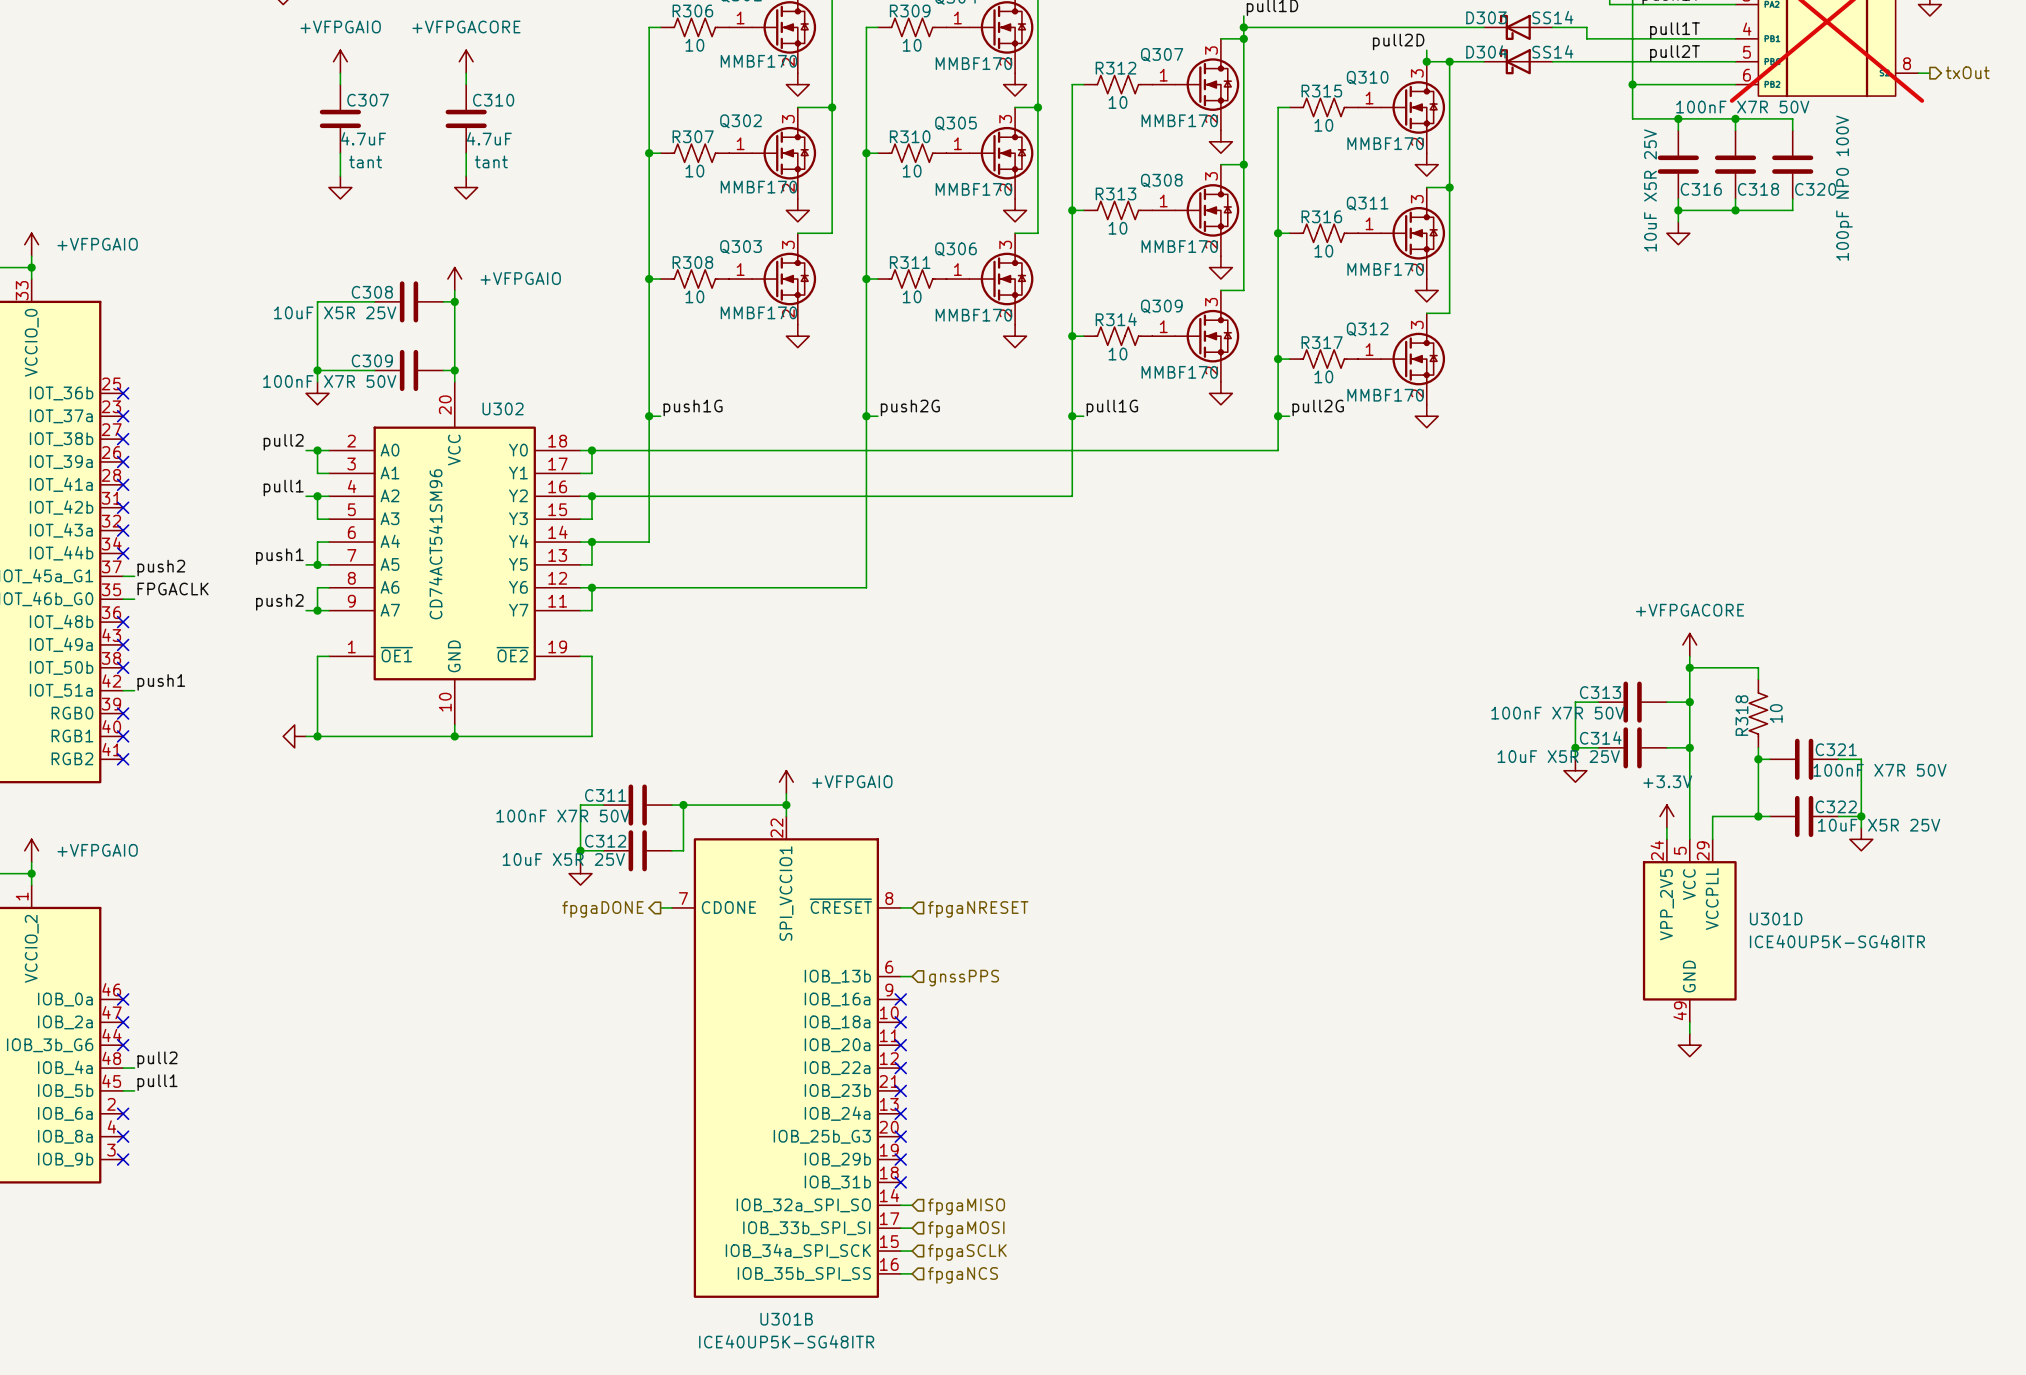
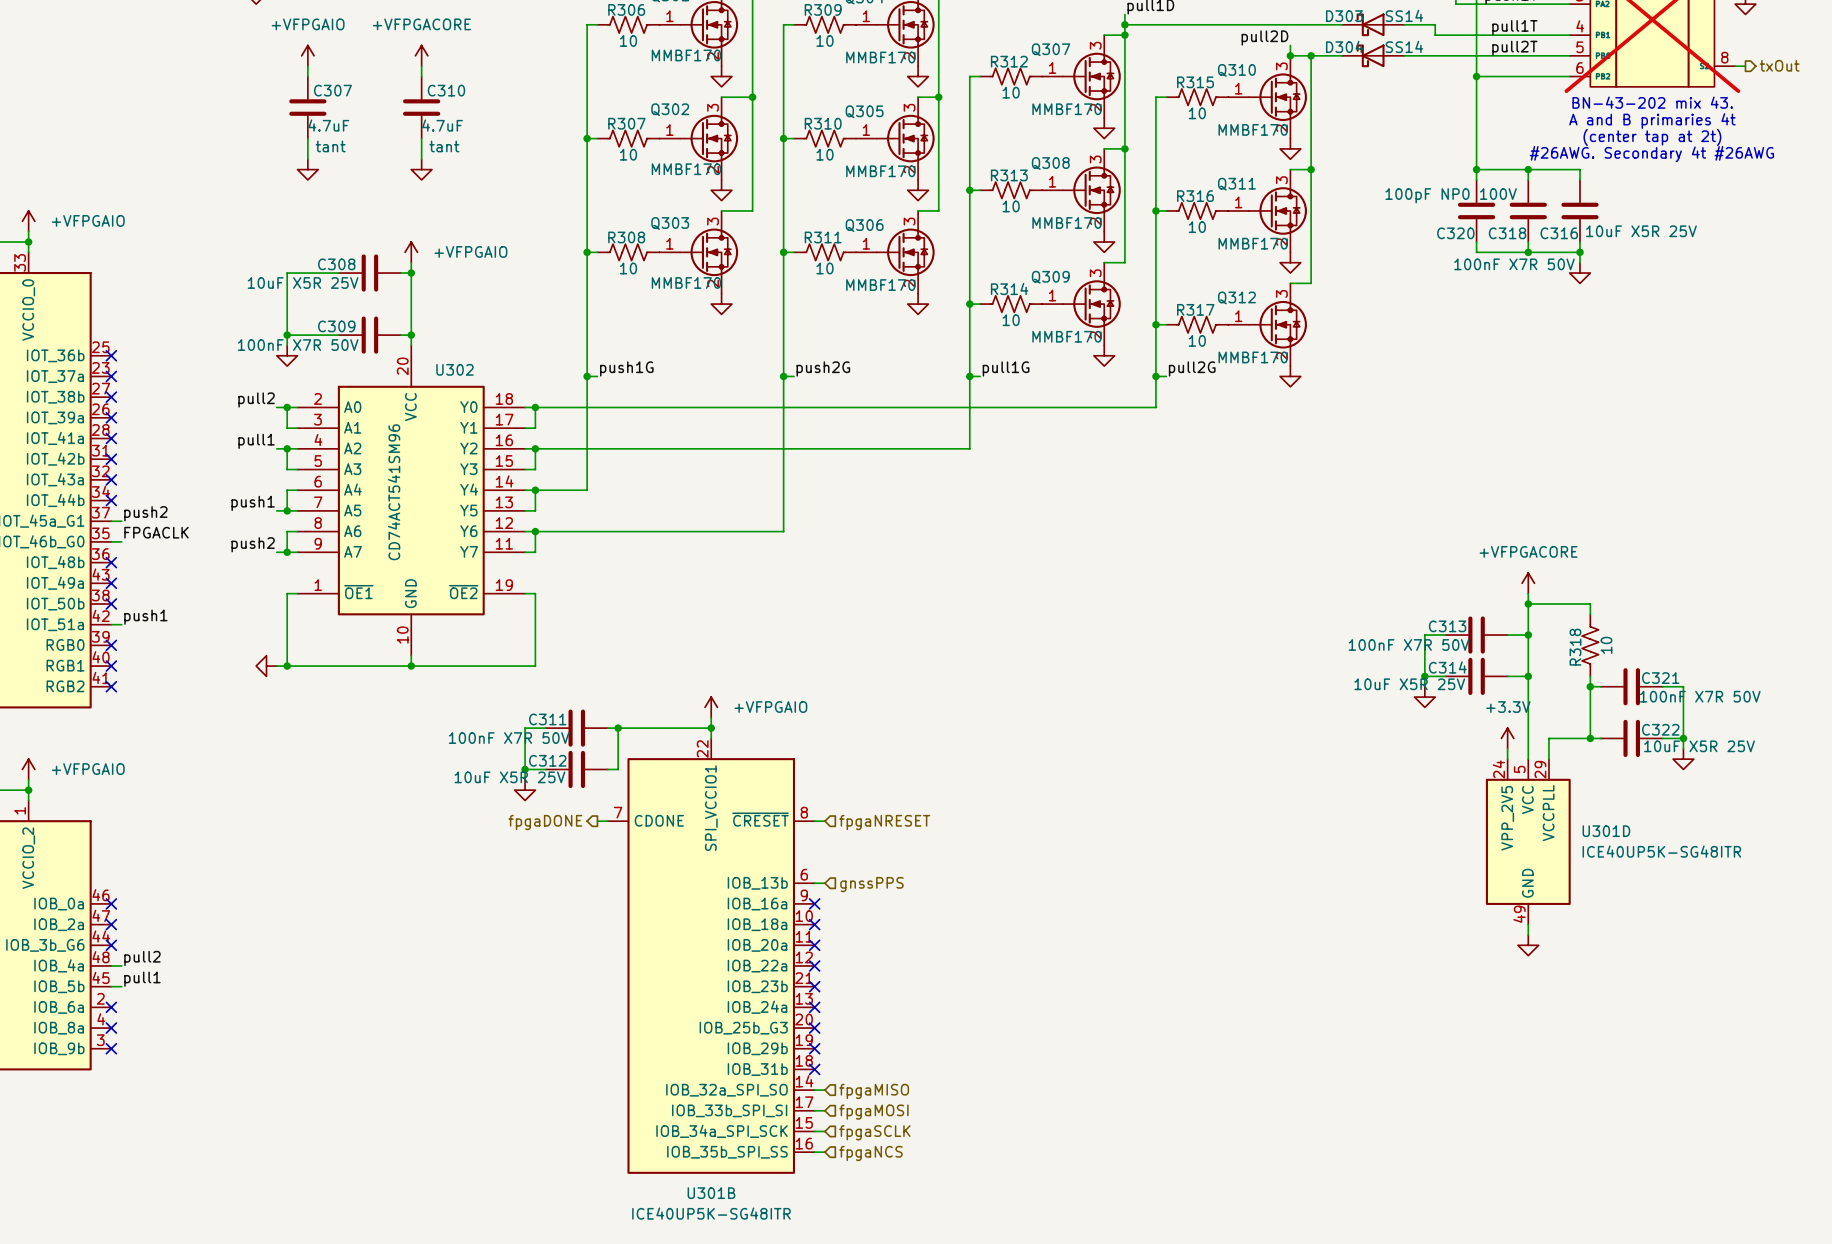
C318 value position: 100nF X7R 50V (1742, 107) -> 100nF X7R 50V (1514, 264)
text: none -> BN-43-202 mix 43. (1652, 102)
wire: (1632, 118) (1792, 118) (1792, 130) -> (1476, 107) (1476, 179)
wire: (1678, 118) (1678, 130) -> none
junction: (1678, 118) -> none
wire: (1735, 118) (1735, 130) -> (1528, 169) (1528, 179)
junction: (1735, 118) -> none
text: none -> A and B primaries 4t (1652, 121)
text: none -> (center tap at 2t) (1652, 137)
C316 position: (1678, 164) -> (1580, 210)
C318 position: (1735, 164) -> (1528, 210)
C320 position: (1792, 164) -> (1476, 210)
text: none -> #26AWG. Secondary 4t #26AWG (1651, 154)
wire: none -> (1476, 169) (1580, 169) (1580, 179)
junction: none -> (1476, 169)
junction: none -> (1528, 169)
C320 value rotation: 0° (1844, 188) -> 90° clockwise (1451, 195)
C316 name position: C316 (1701, 189) -> C316 (1559, 233)
C318 name position: C318 (1758, 189) -> C318 (1507, 233)
C320 name position: C320 (1815, 189) -> C320 (1455, 233)
C316 value rotation: 0° (1650, 190) -> 90° clockwise (1641, 231)
wire: (1678, 198) (1678, 221) -> (1580, 242) (1580, 262)
wire: (1735, 198) (1735, 210) -> (1528, 242) (1528, 252)
wire: (1792, 198) (1792, 210) (1678, 210) -> none
junction: (1678, 210) -> none
junction: (1735, 210) -> none
power symbol position: (1678, 233) -> (1580, 273)
wire: none -> (1476, 242) (1476, 252) (1580, 252)
junction: none -> (1528, 252)
junction: none -> (1580, 252)

